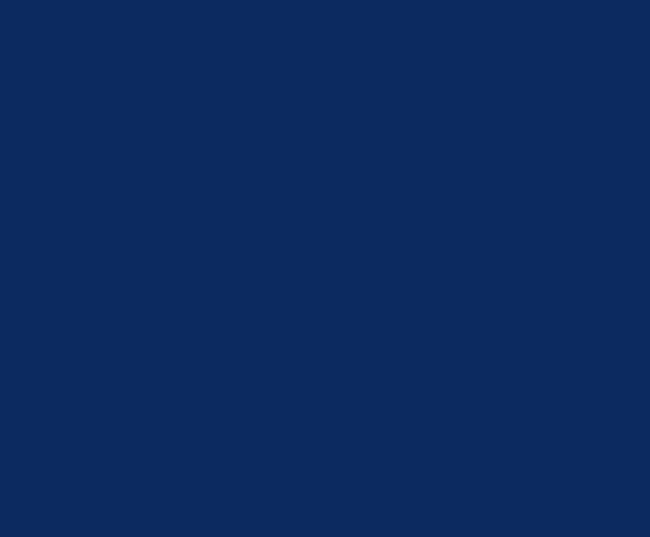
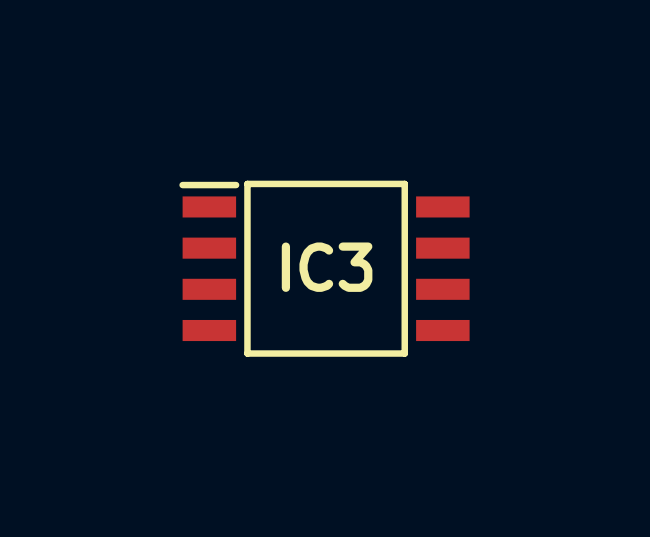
IC3: none -> (324, 268)

